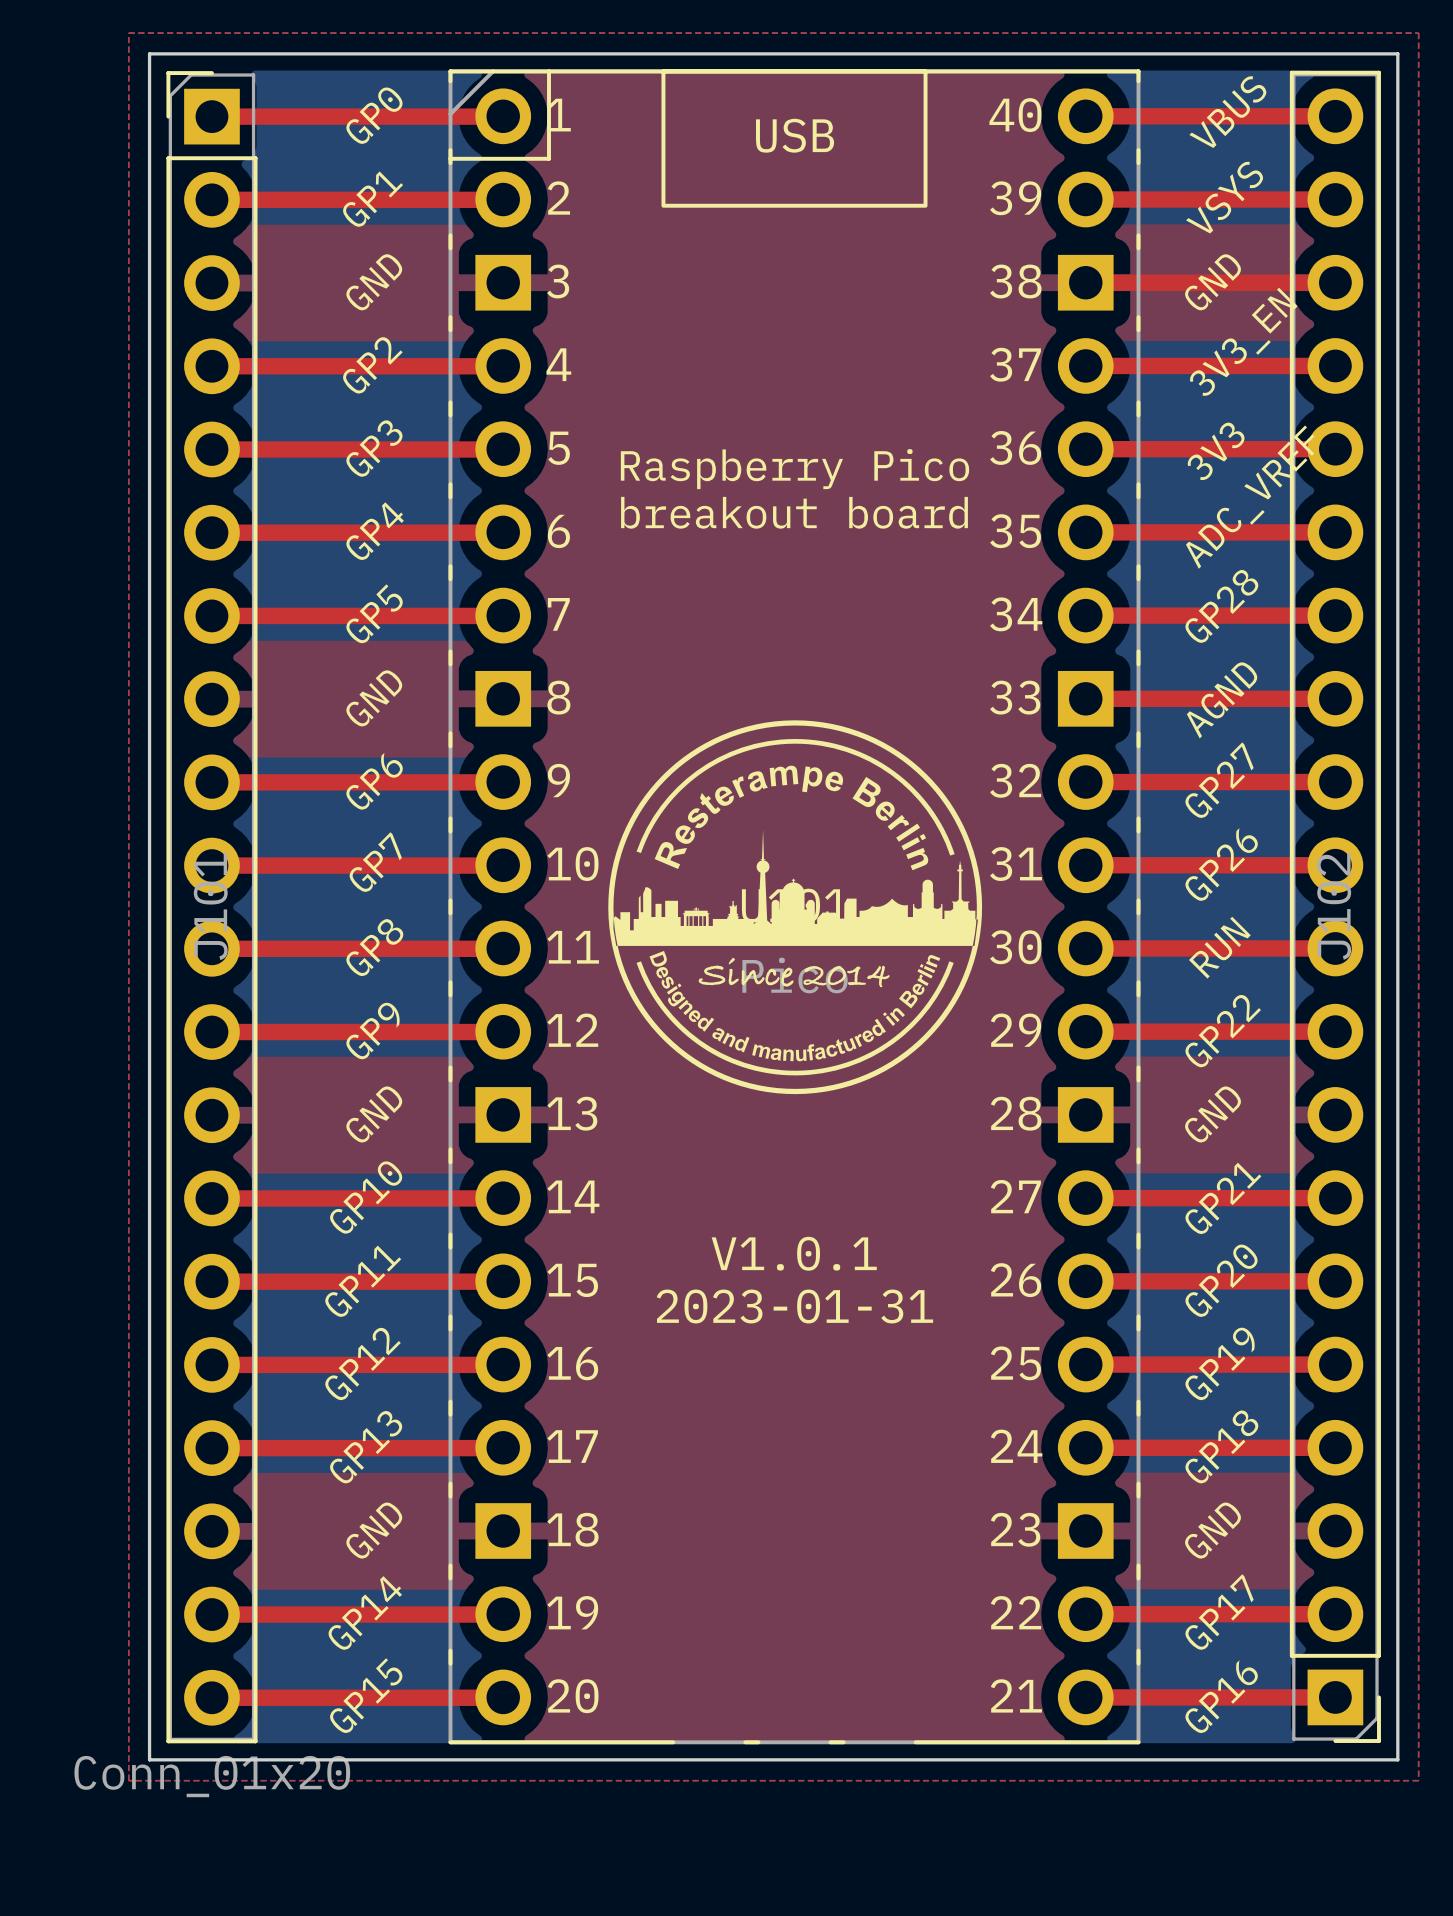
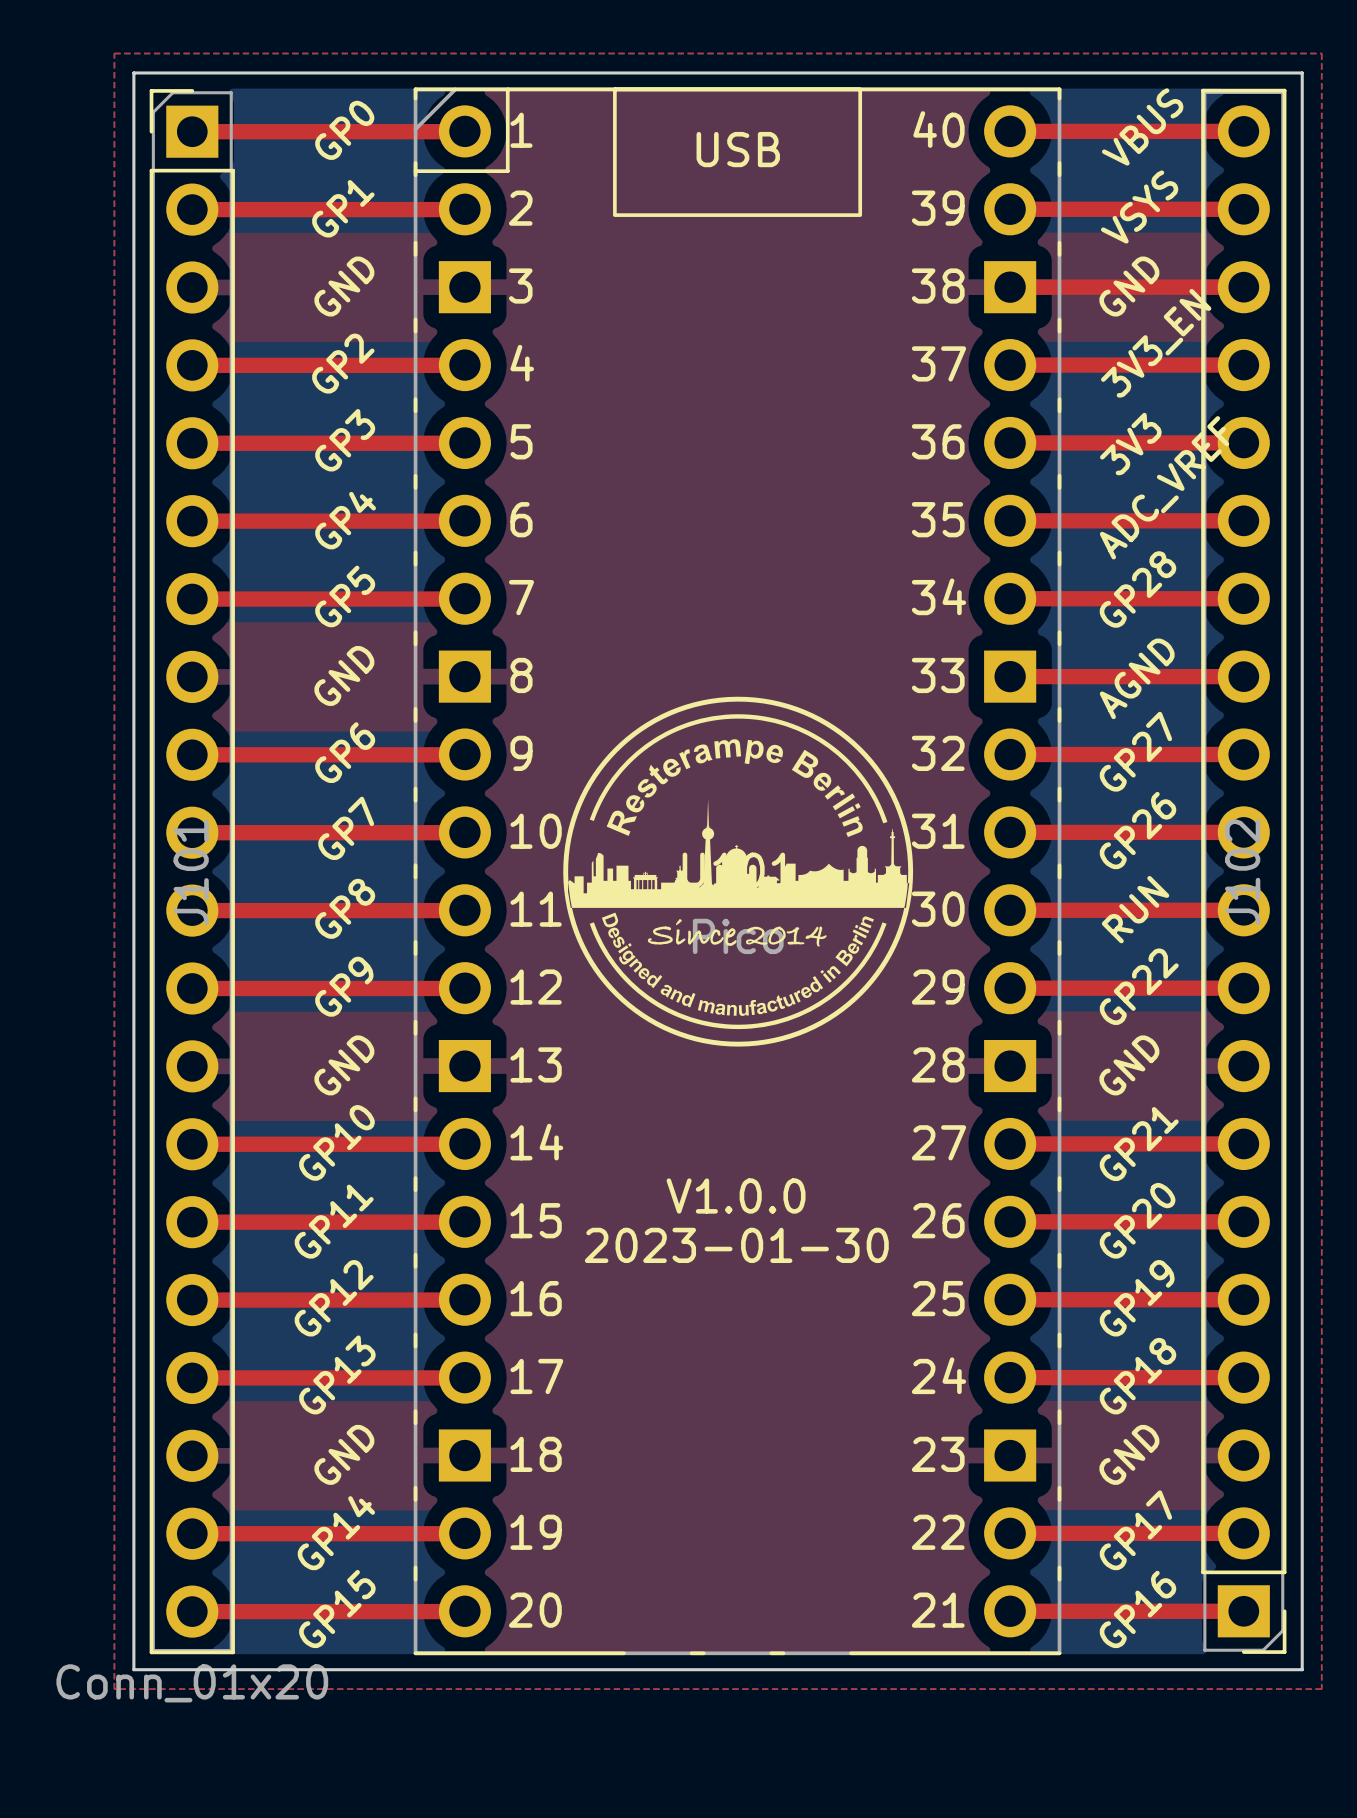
text: Raspberry Pico (795, 469) -> none
text: breakout board (794, 512) -> none
text: V1.0.1 (794, 1253) -> V1.0.0 (736, 1196)
text: 2023-01-31 (794, 1306) -> 2023-01-30 (736, 1245)

